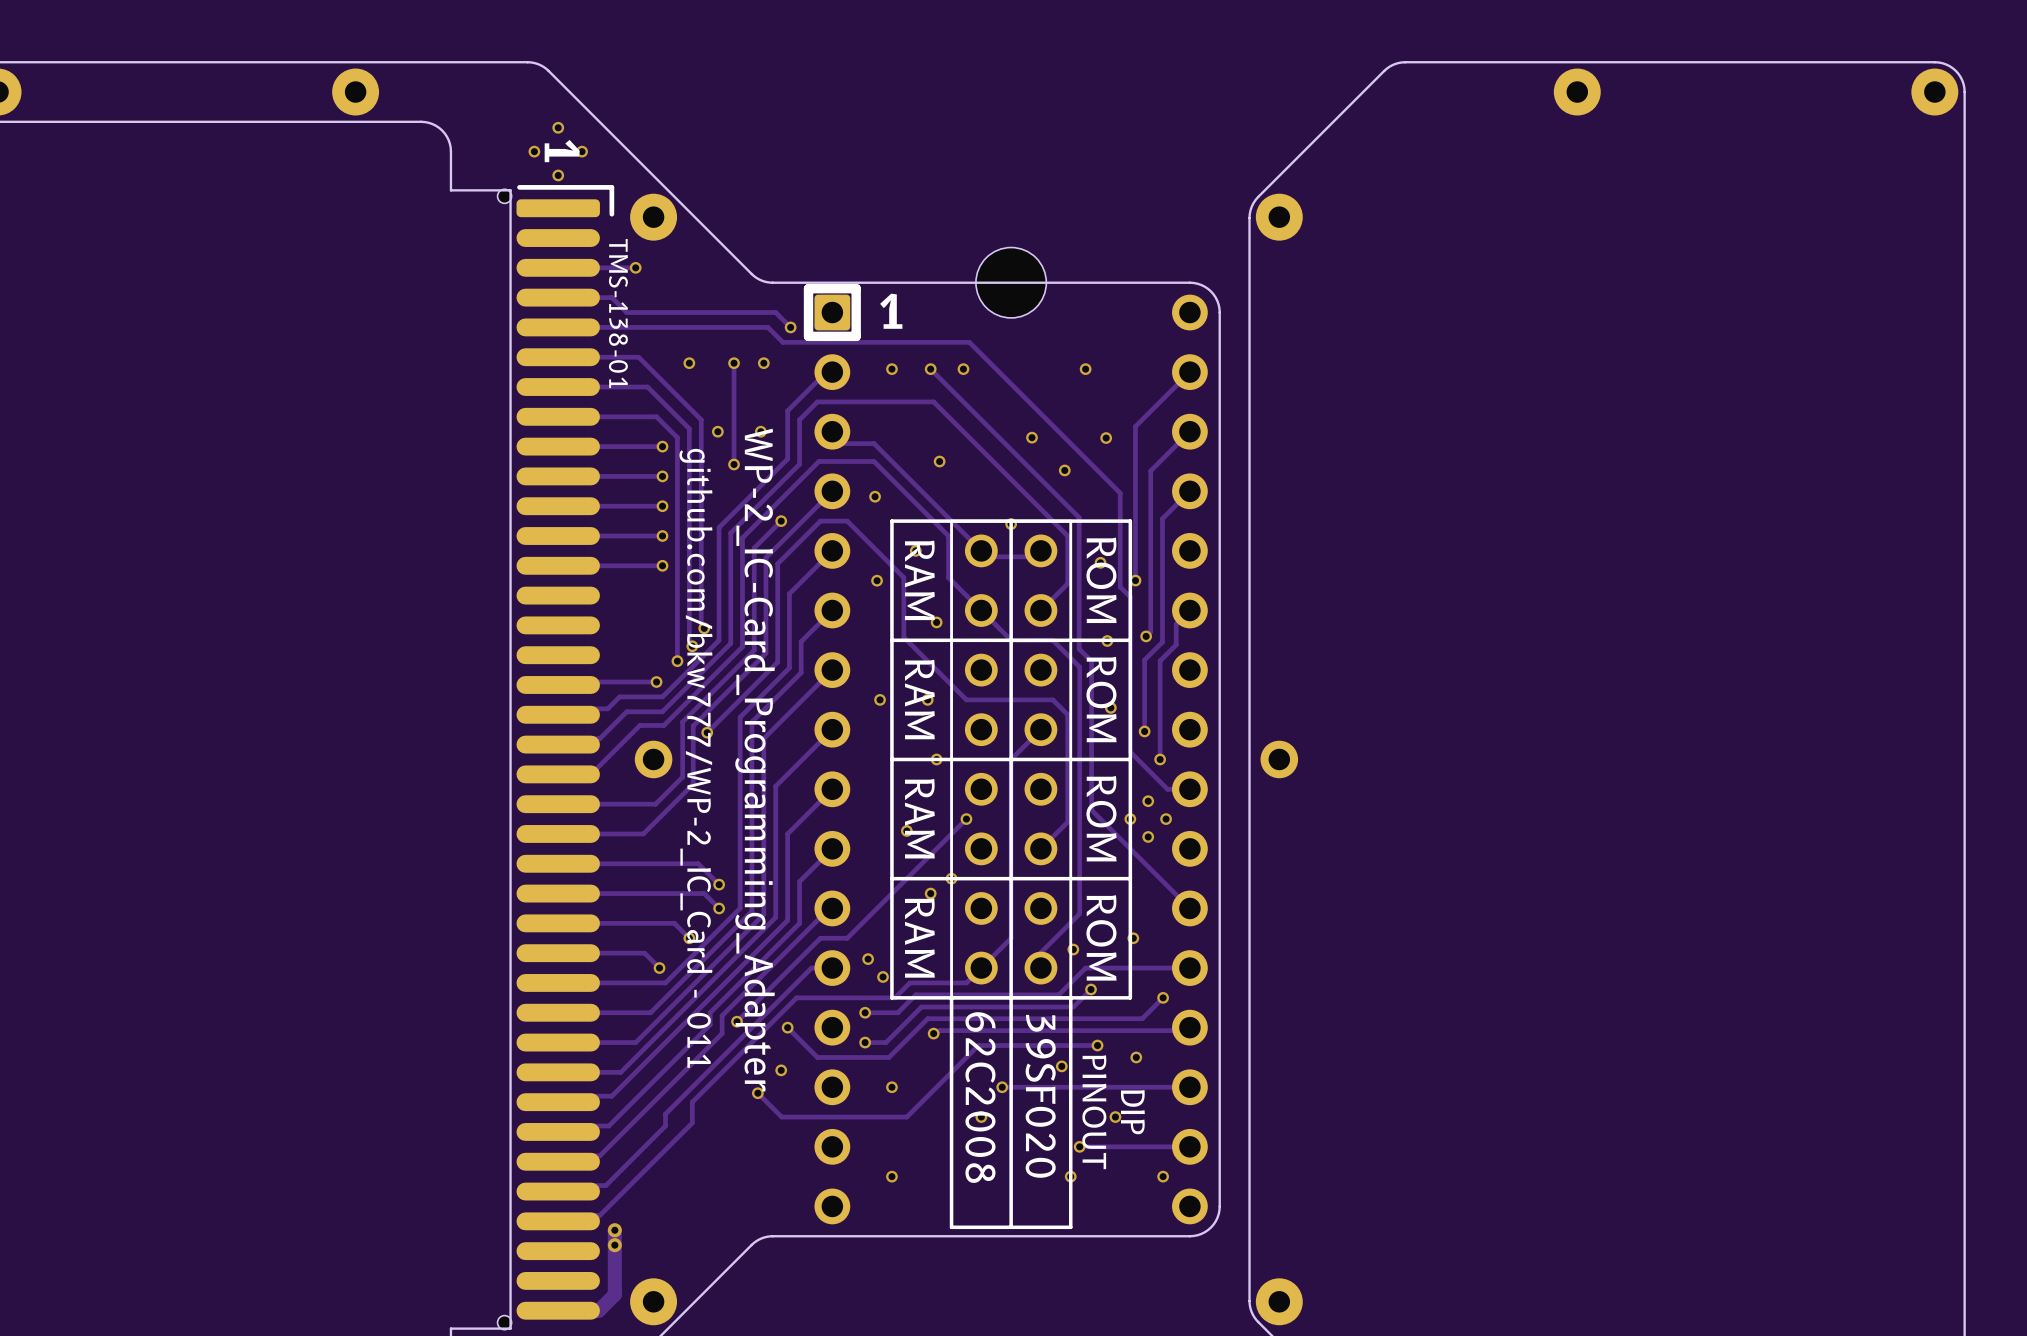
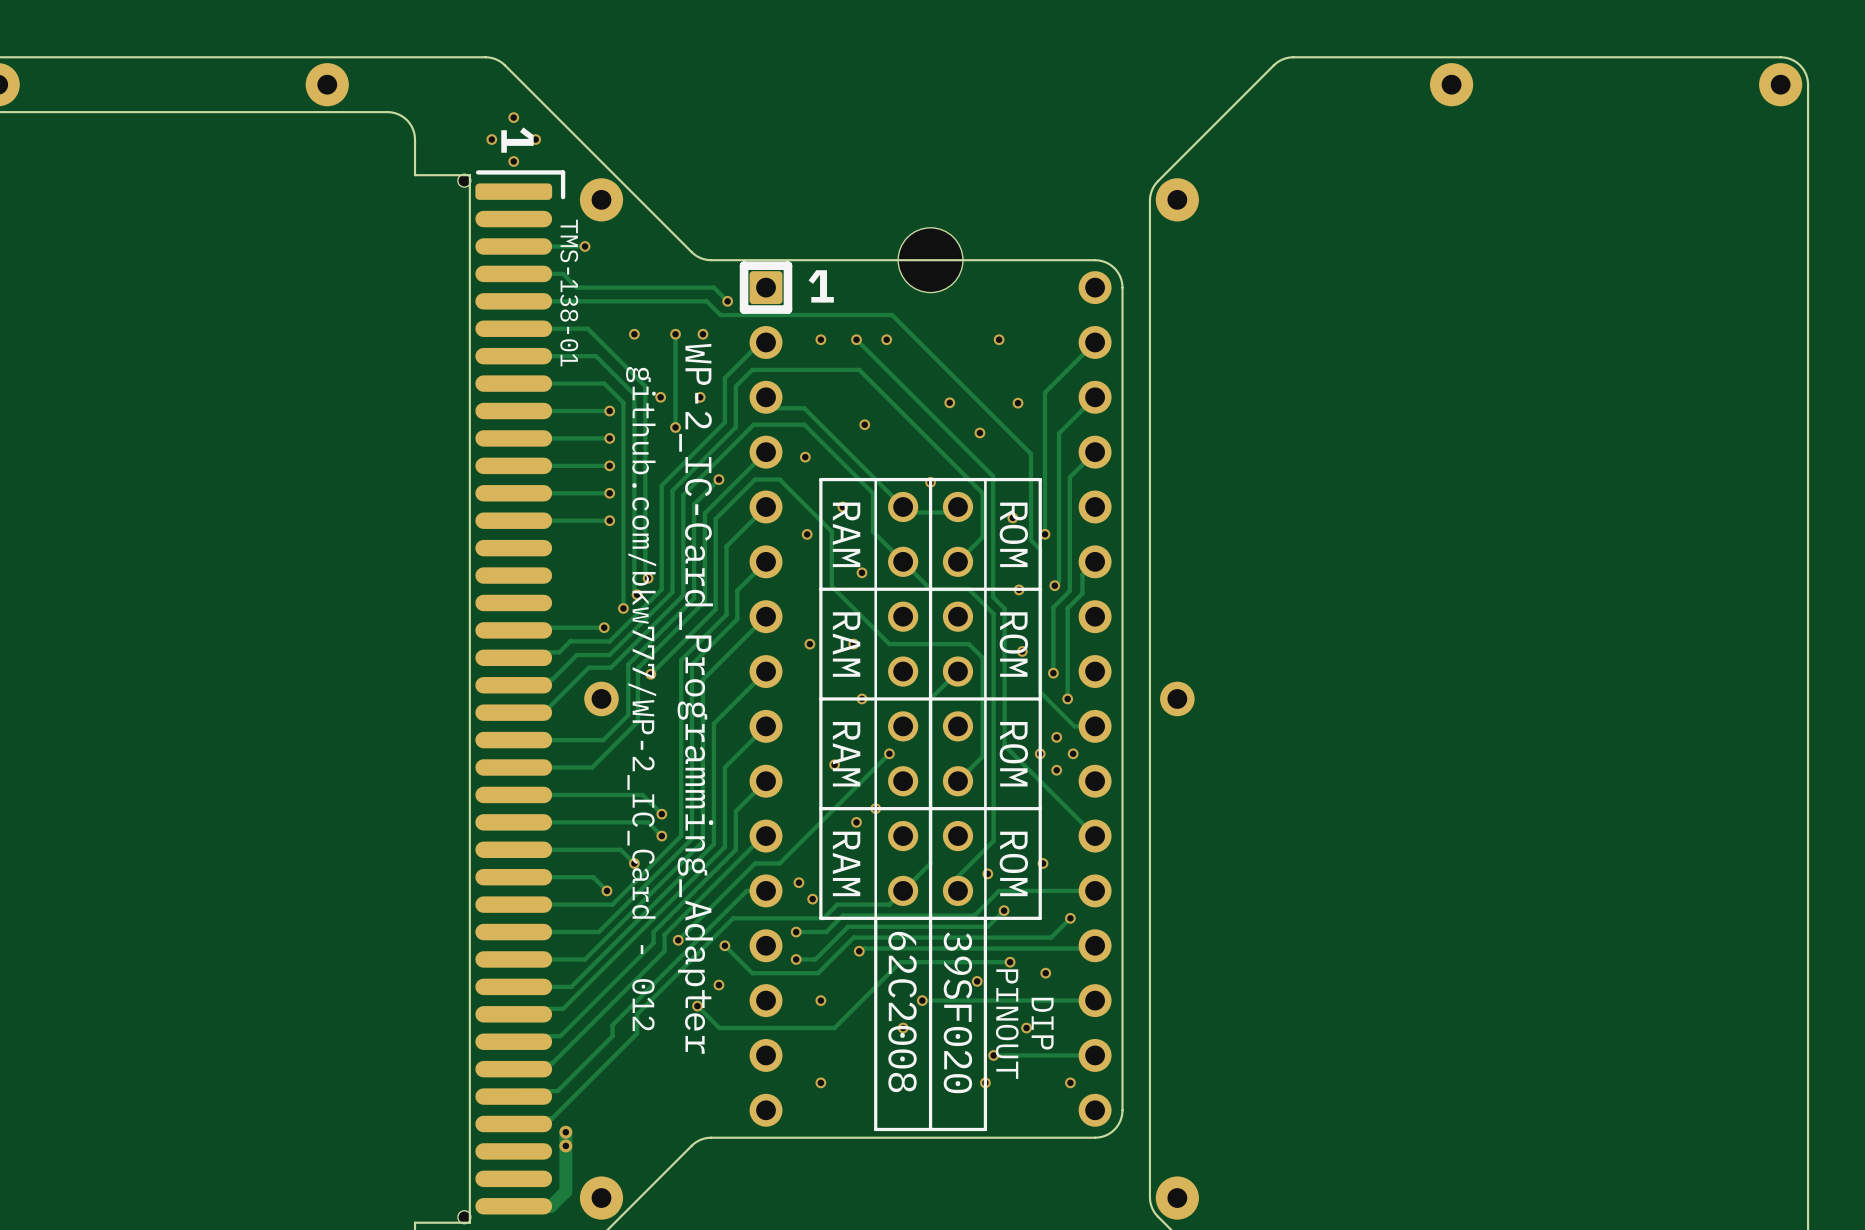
text: github.com/bkw777/WP-2_IC_Card - 011 (695, 758) -> github.com/bkw777/WP-2_IC_Card - 012 (641, 699)

